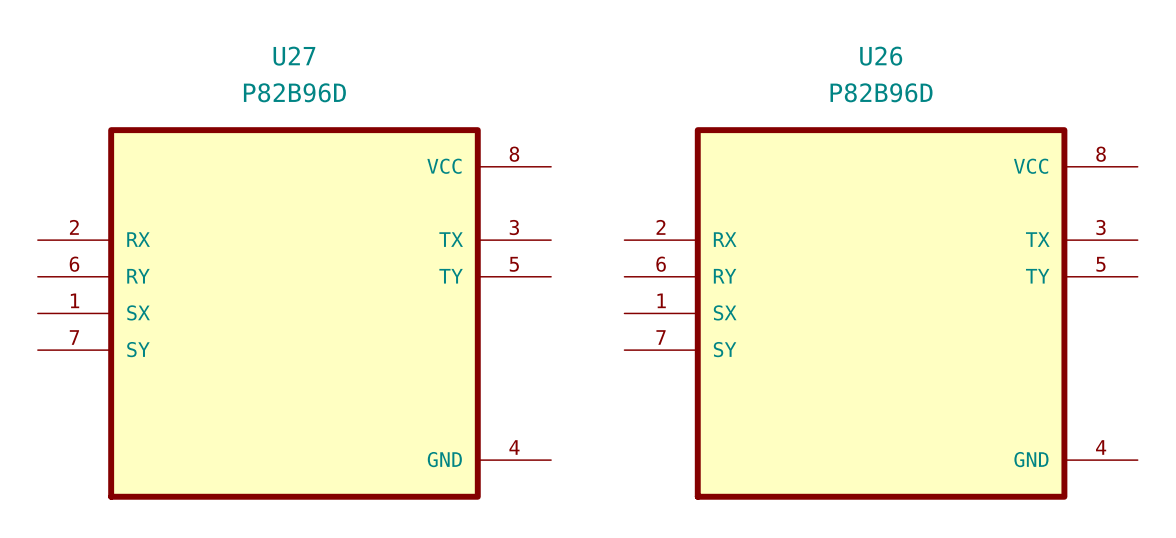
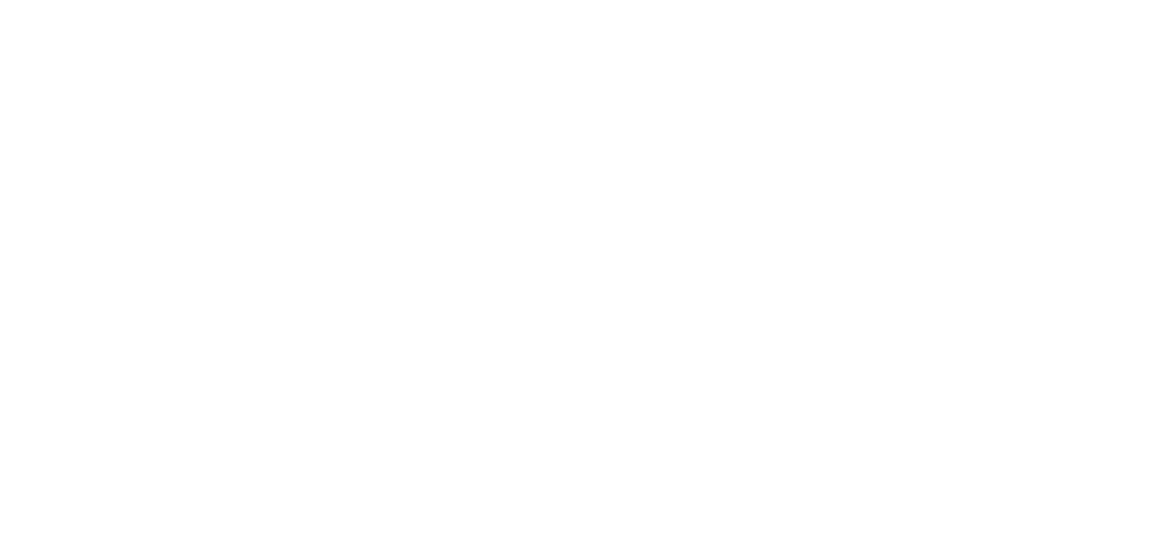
U27: P82B96D (294, 313) -> none
U26: P82B96D (881, 313) -> none

